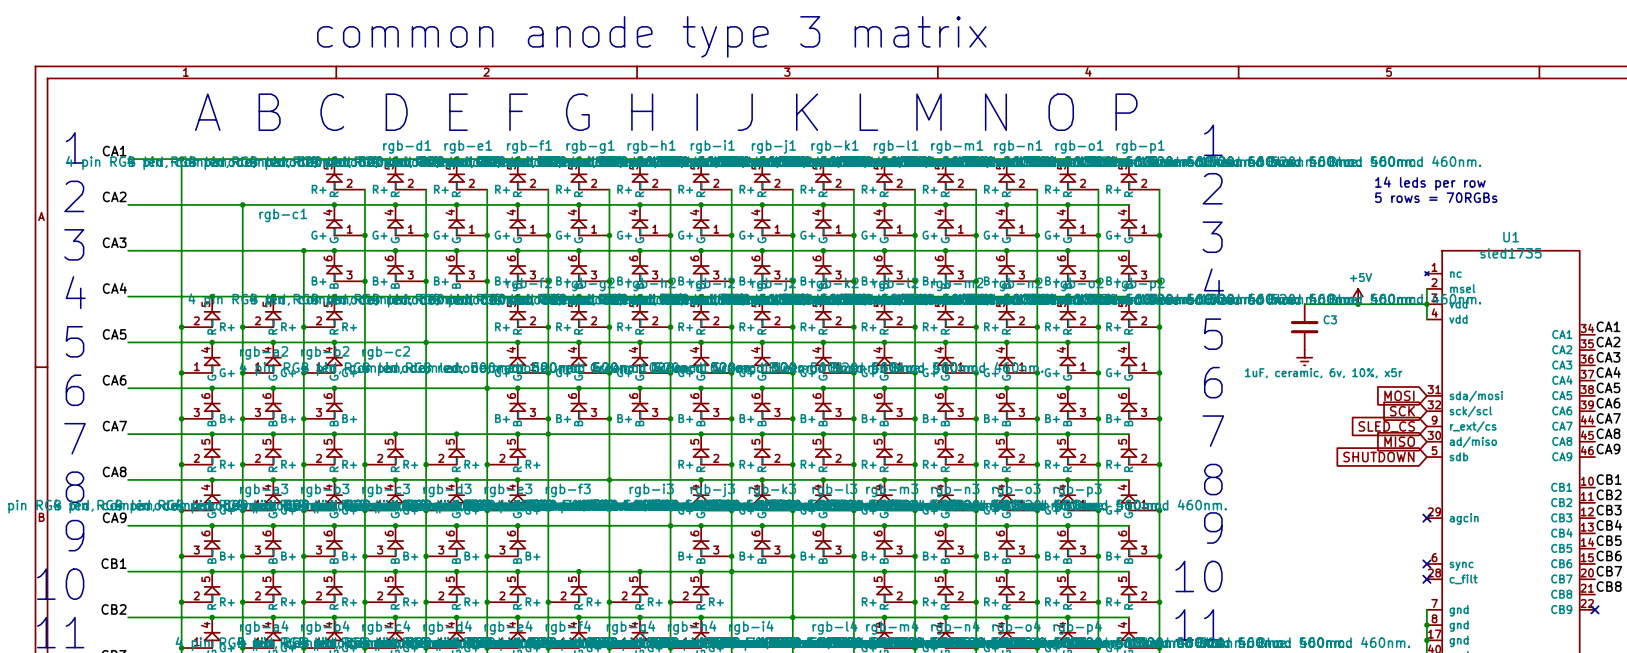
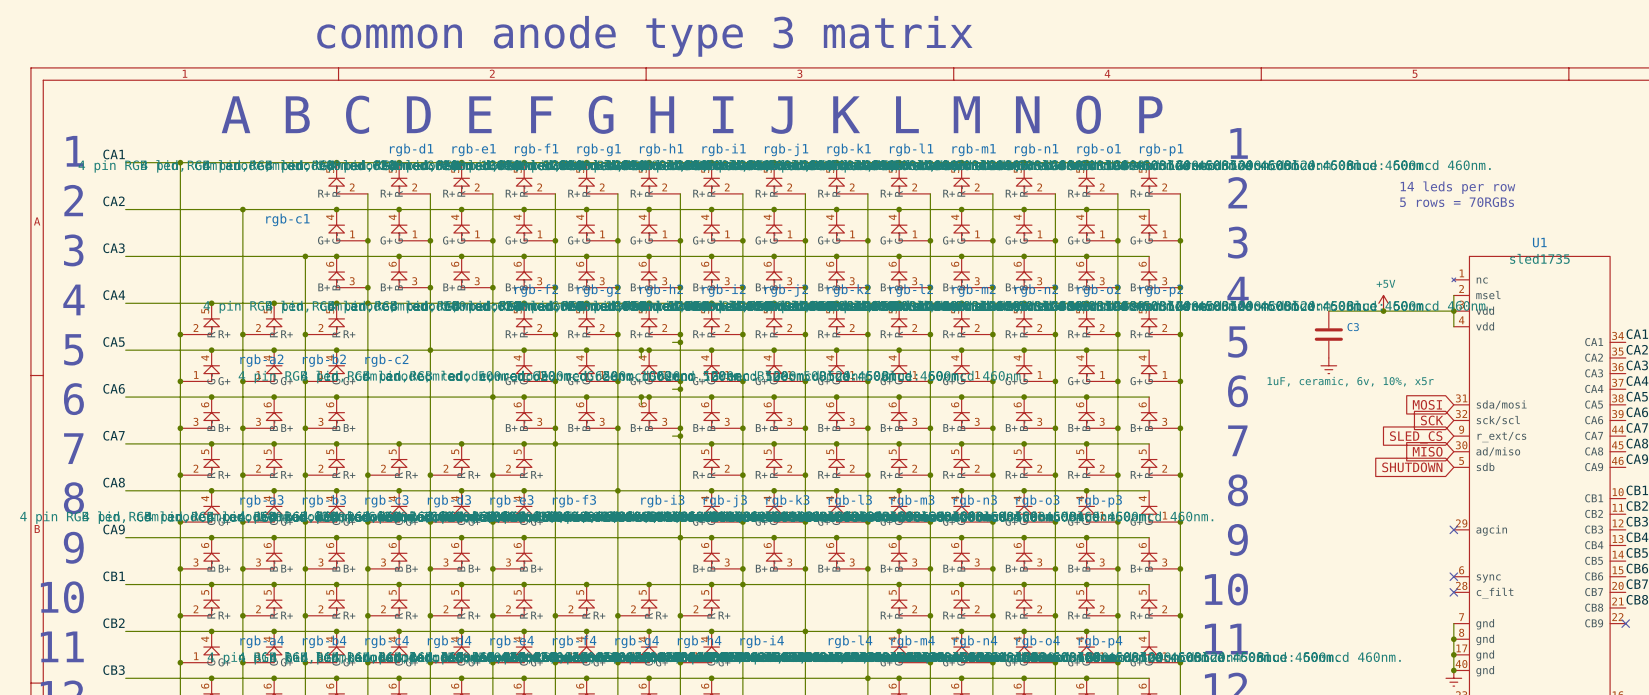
wire: none -> (672, 342) (680, 342)
junction: none -> (680, 342)
wire: none -> (641, 350) (641, 357)
junction: none -> (641, 350)
wire: none -> (672, 389) (680, 389)
junction: none -> (680, 389)
wire: none -> (641, 397) (641, 404)
junction: none -> (641, 397)
wire: none -> (672, 436) (680, 436)
junction: none -> (680, 436)

